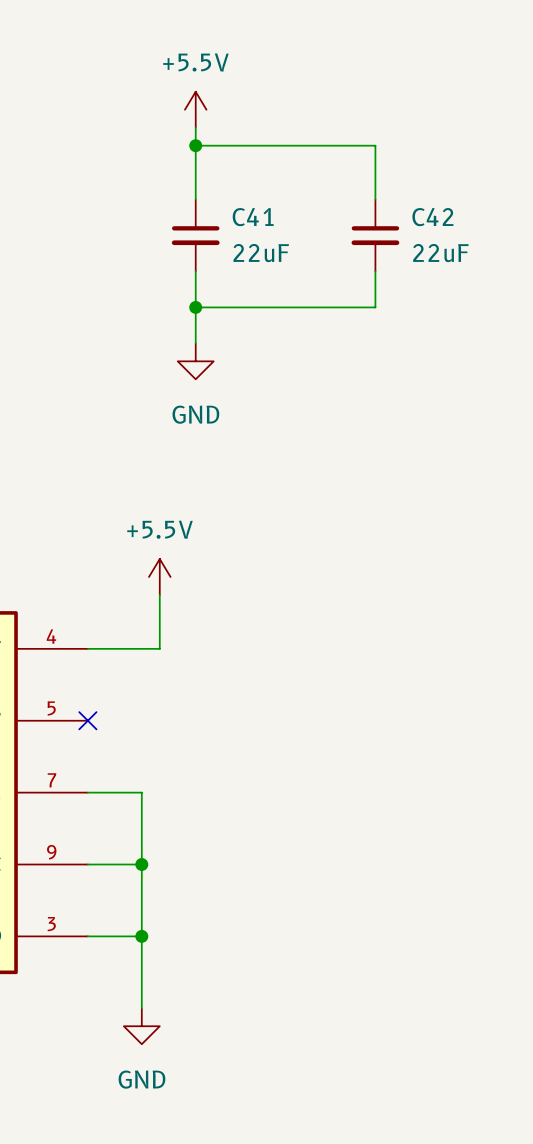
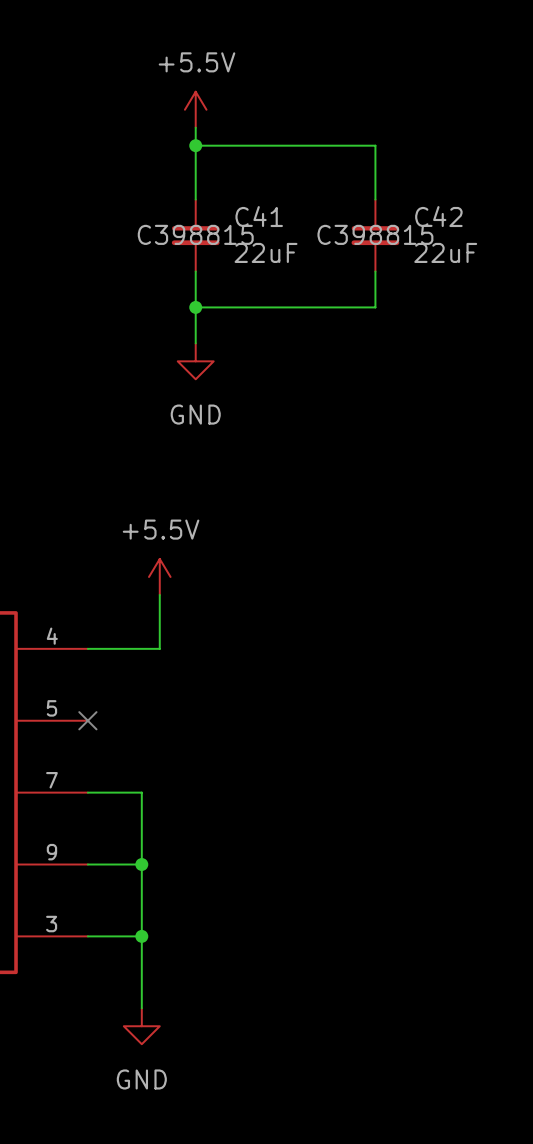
C41 text: none -> C398815 (195, 234)
C42 text: none -> C398815 (375, 234)

